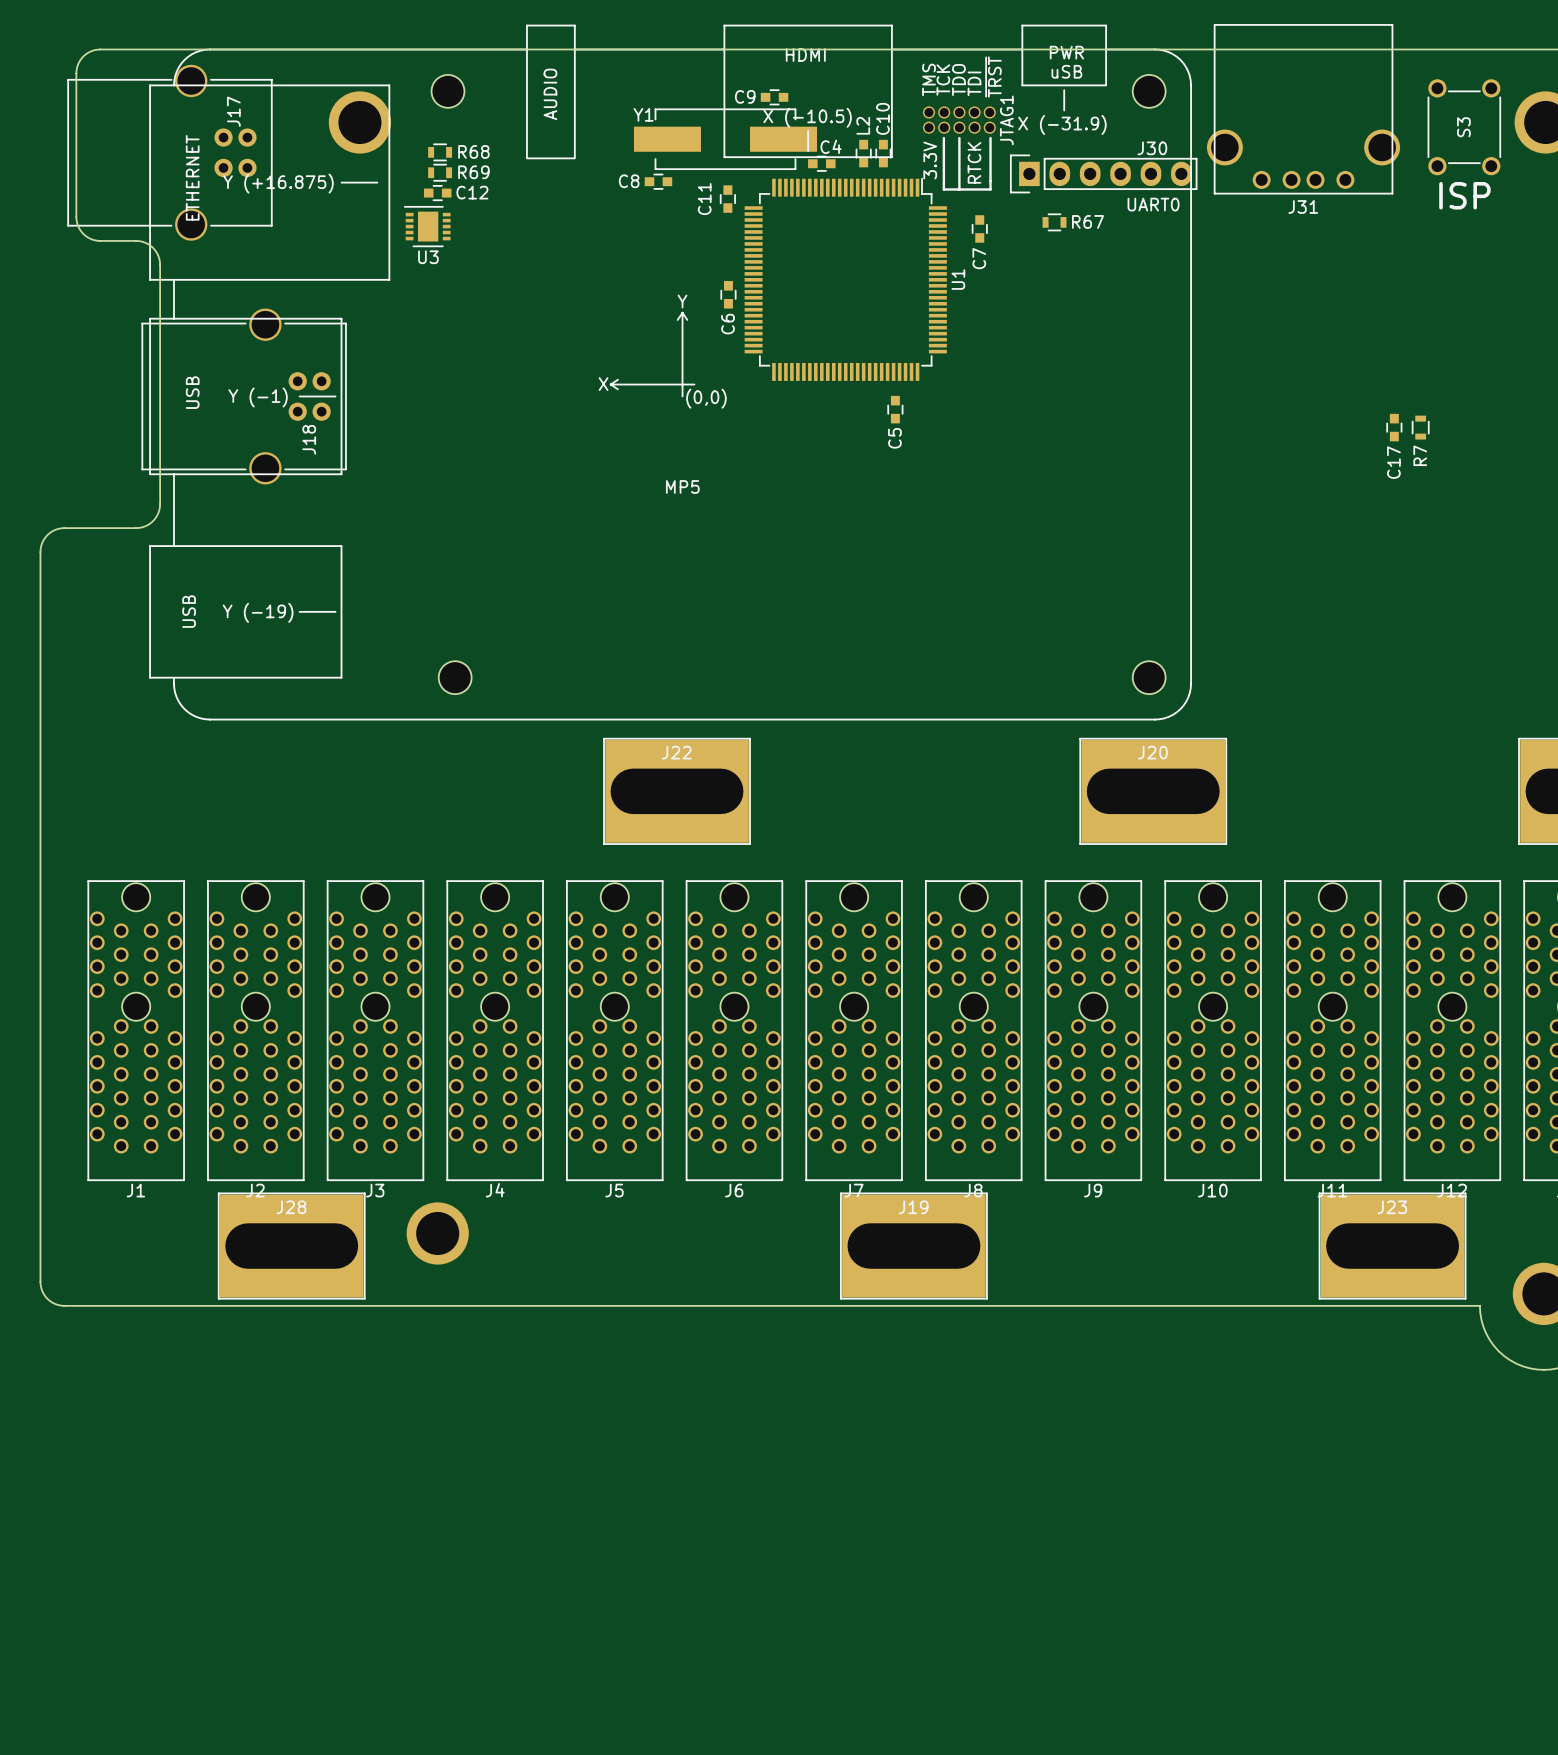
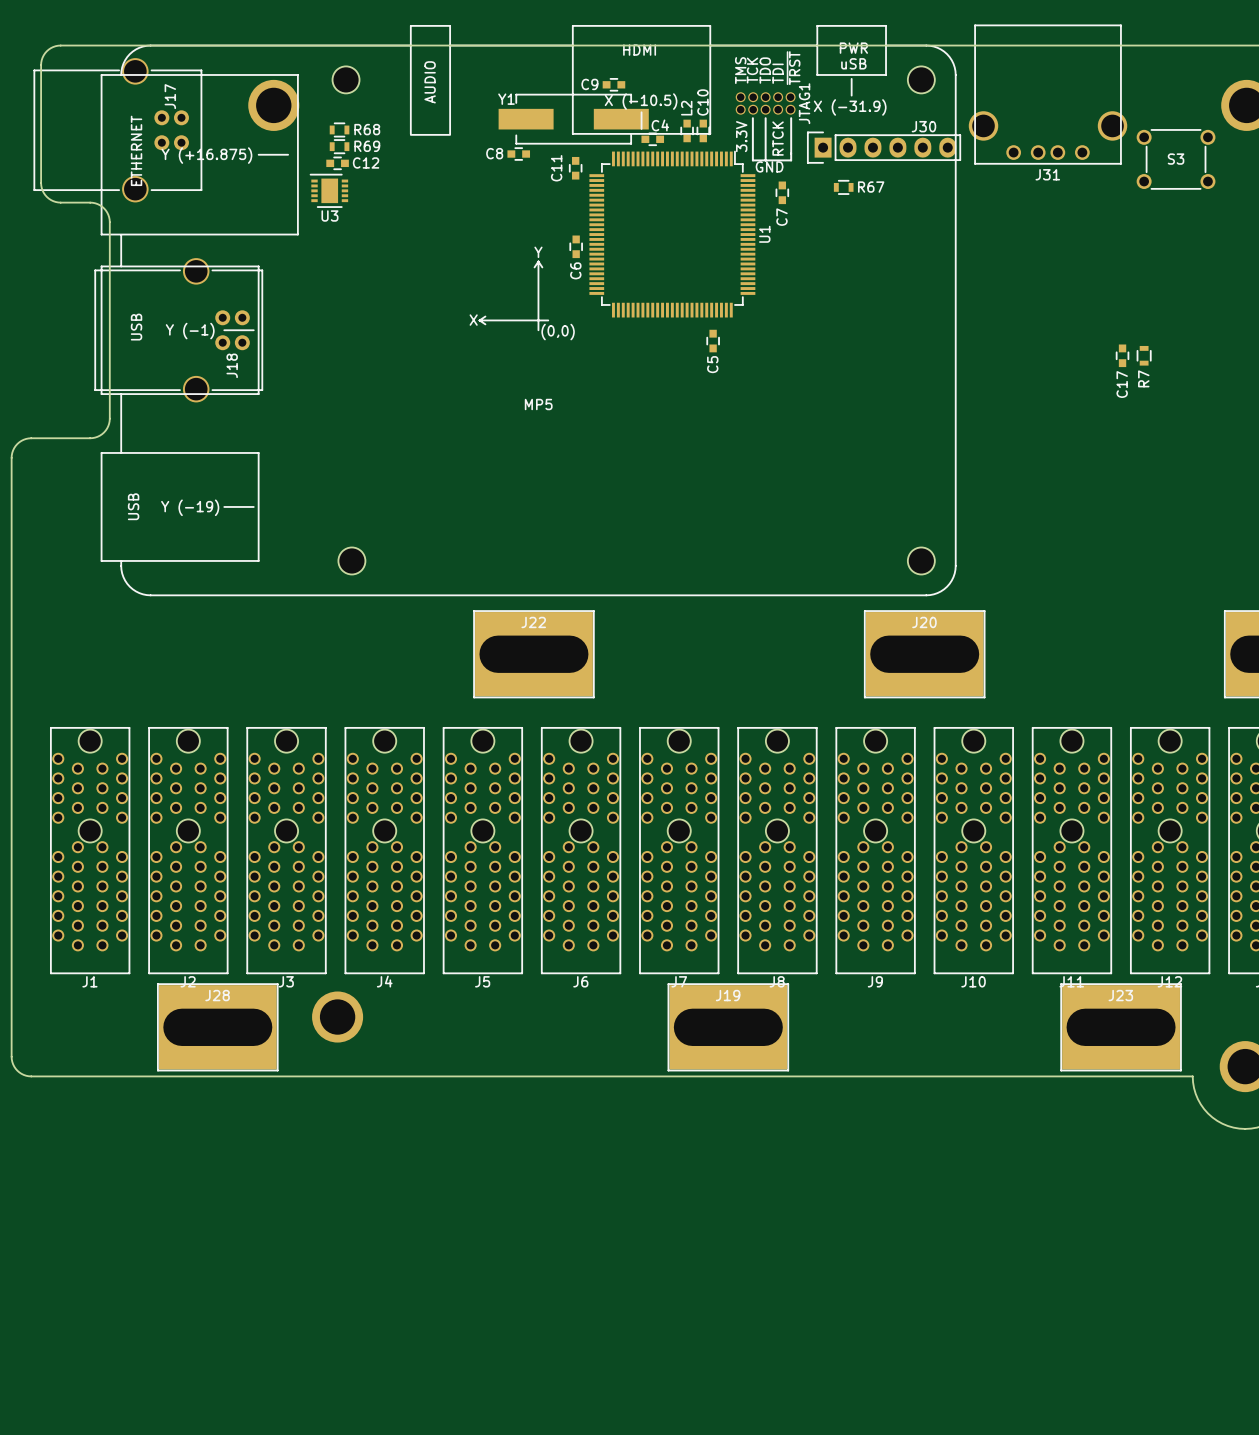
S3 rotation: 0° (1464, 127) -> 90° clockwise (1176, 159)
S3 position: (1464, 127) -> (1176, 159)
text: ISP (1464, 195) -> none
text: none -> GND (769, 166)
text: UART0 (1153, 204) -> none

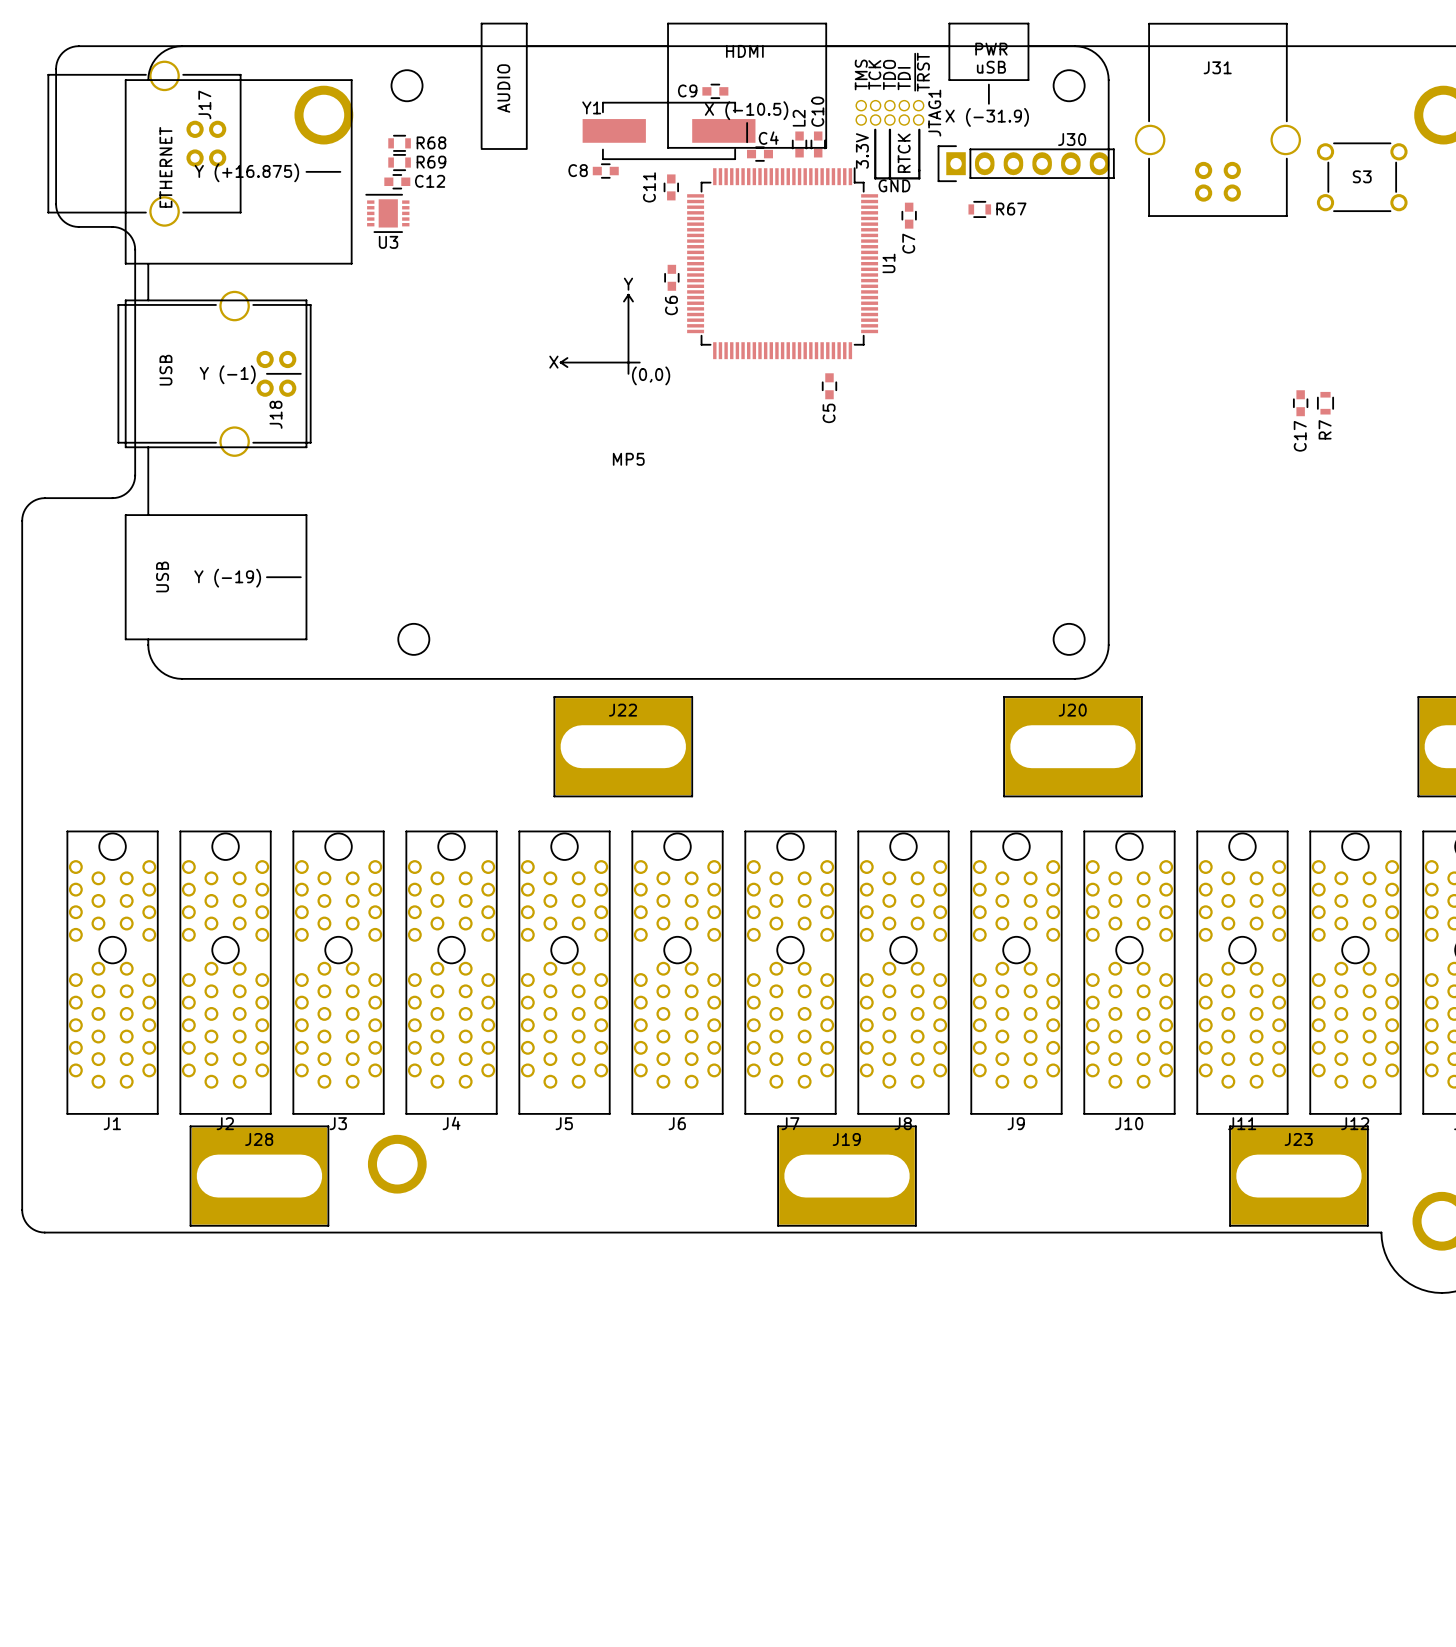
J31 footprint: [968, 24, 1128, 165] -> [1134, 22, 1301, 217]
J31 name position: J31 (1047, 174) -> J31 (1217, 67)

